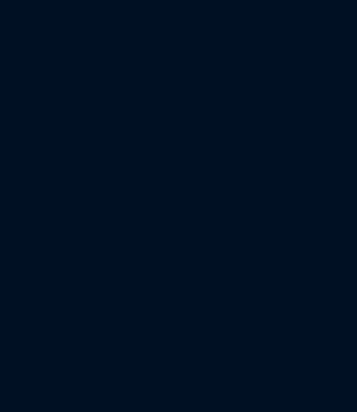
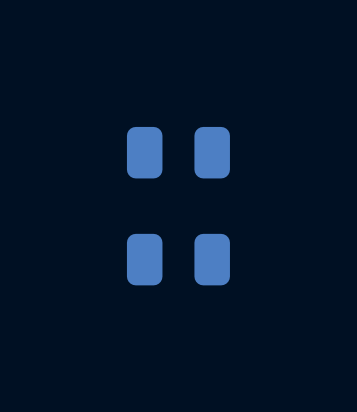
part: none -> (178, 152)
part: none -> (178, 259)

